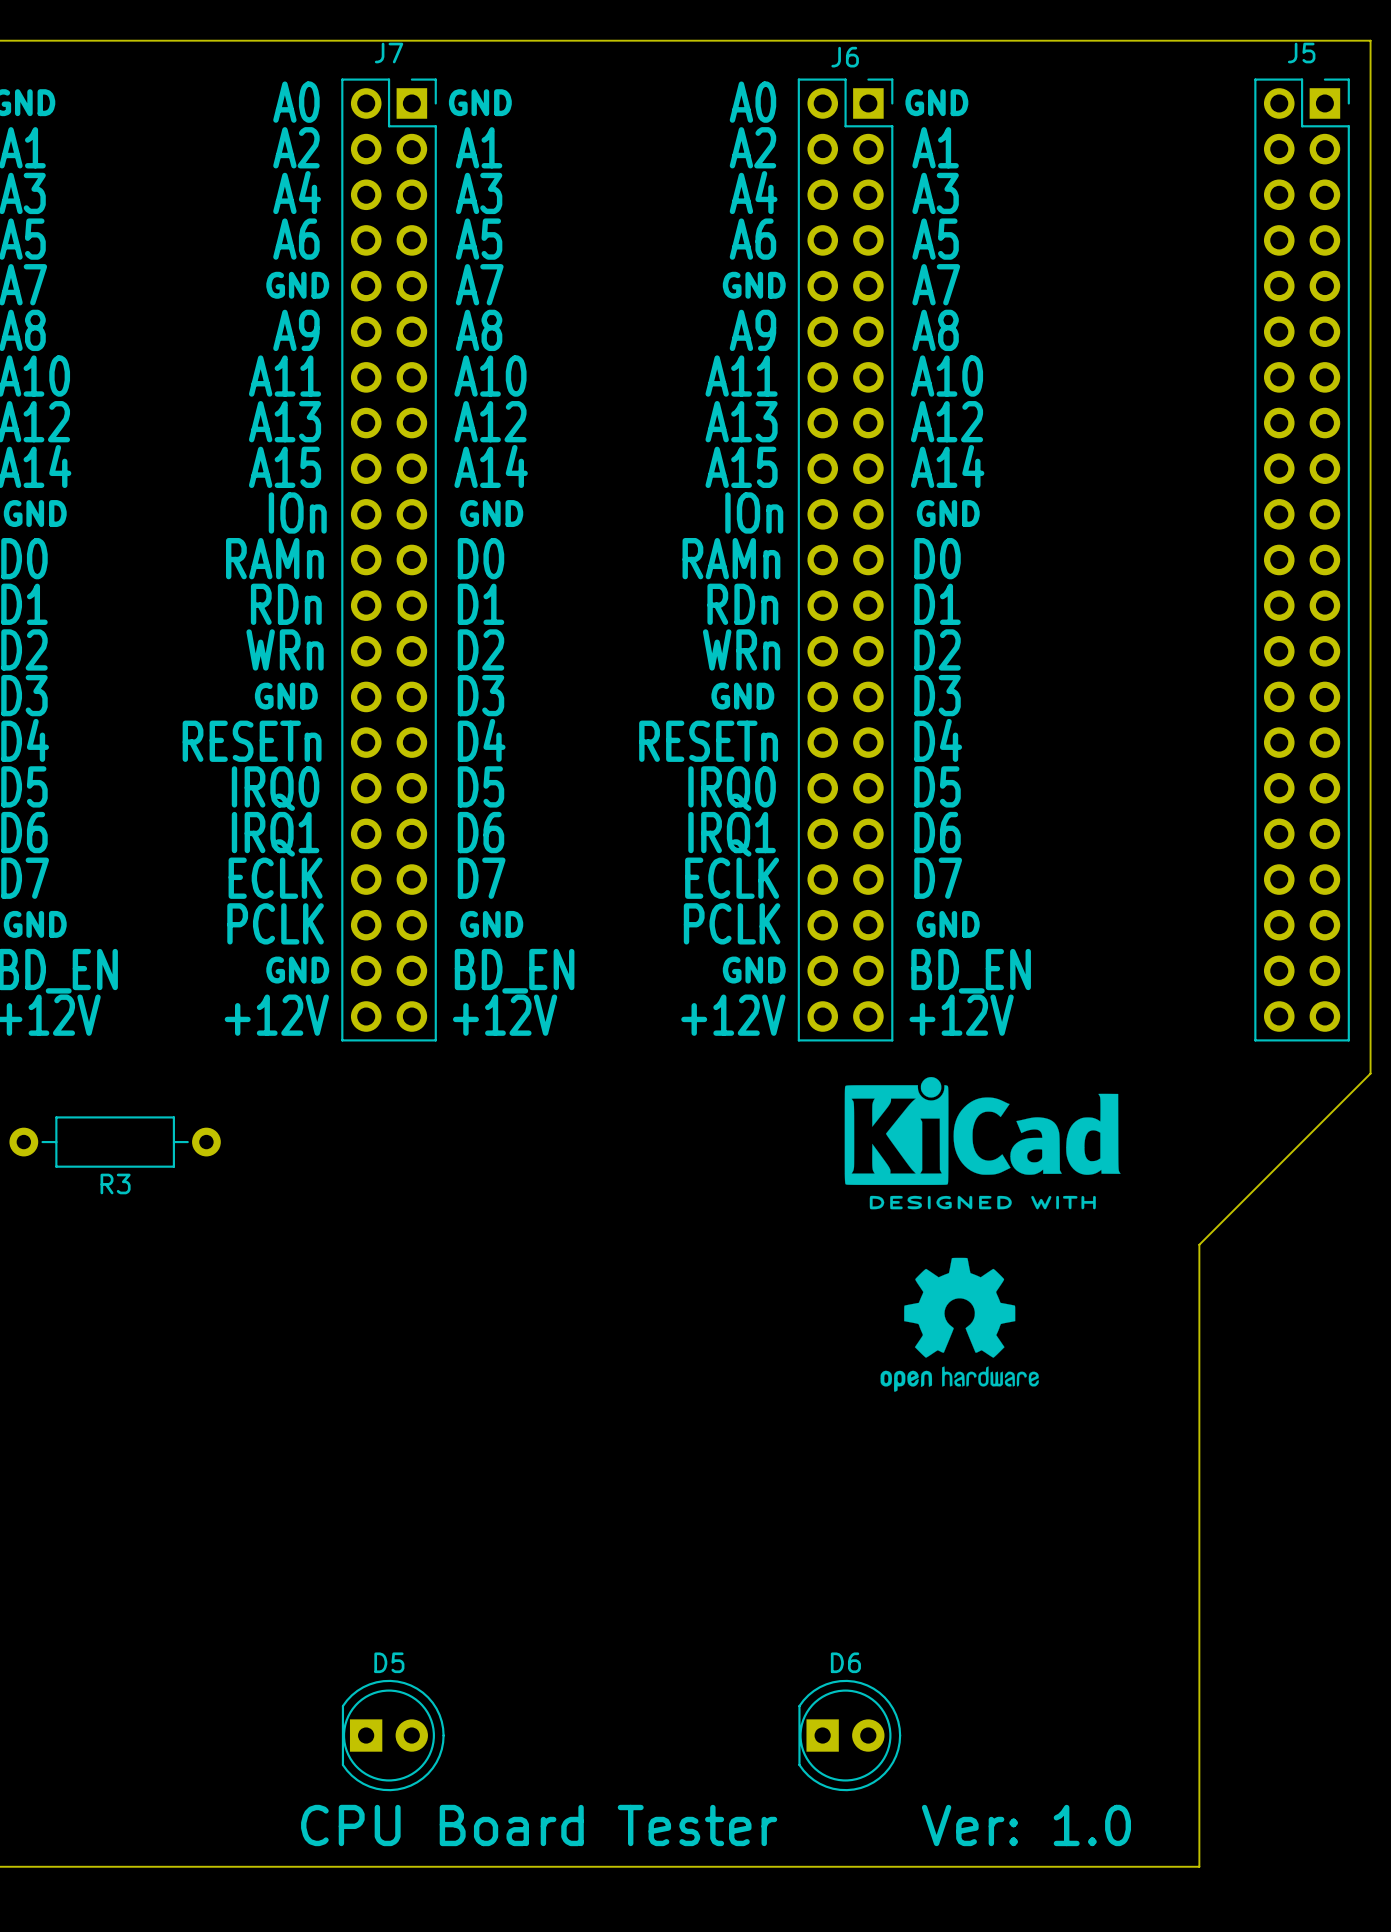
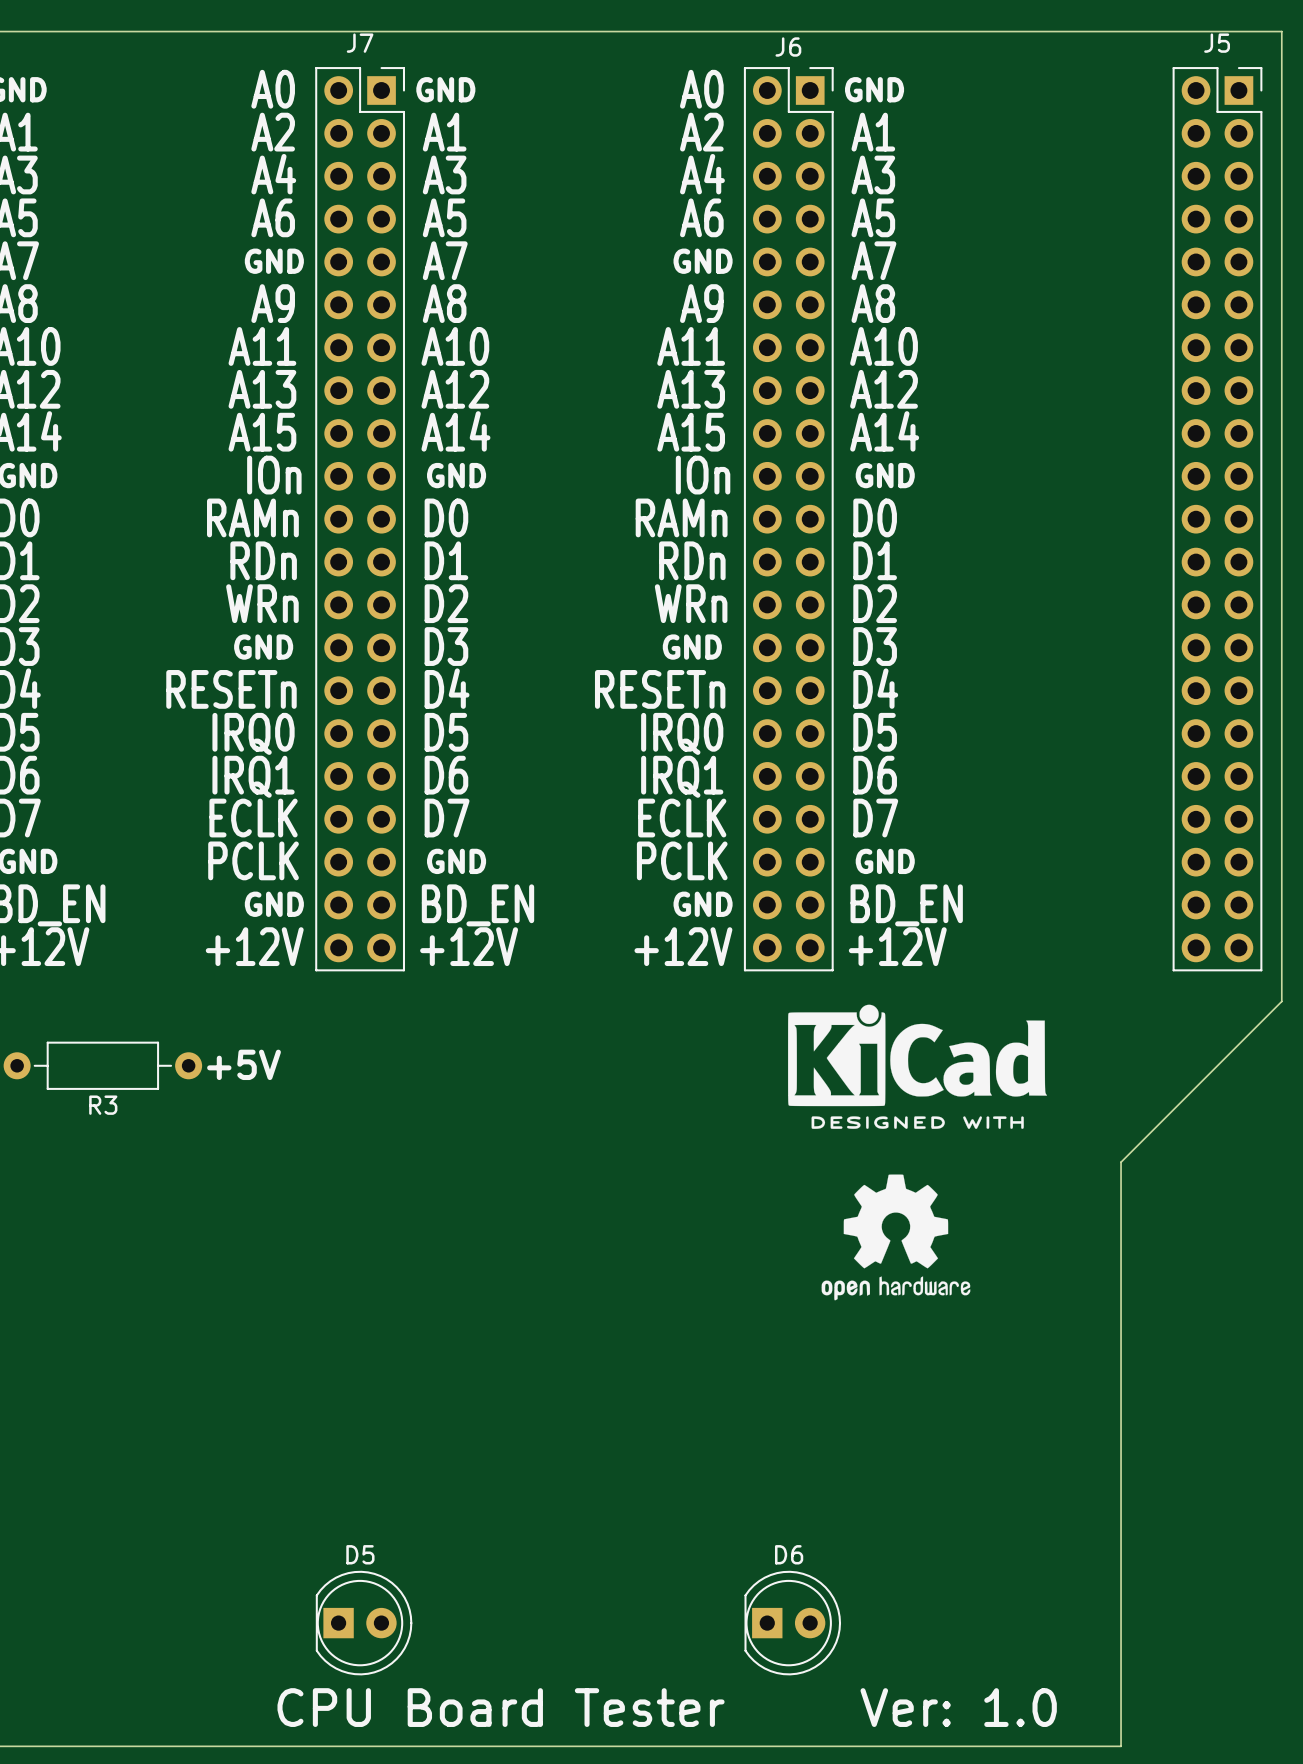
text: none -> +5V (244, 1064)

